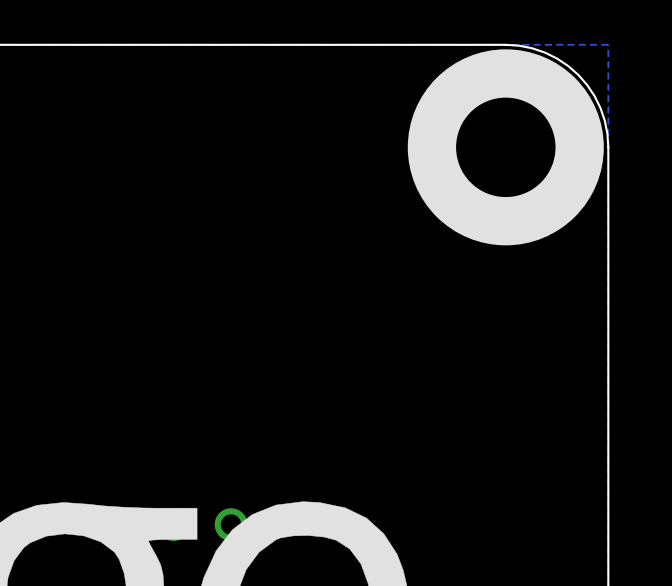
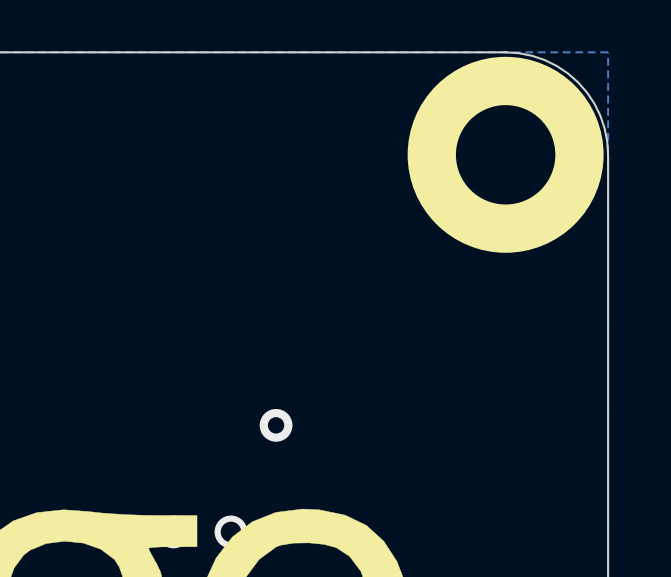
via: none -> (276, 425)

